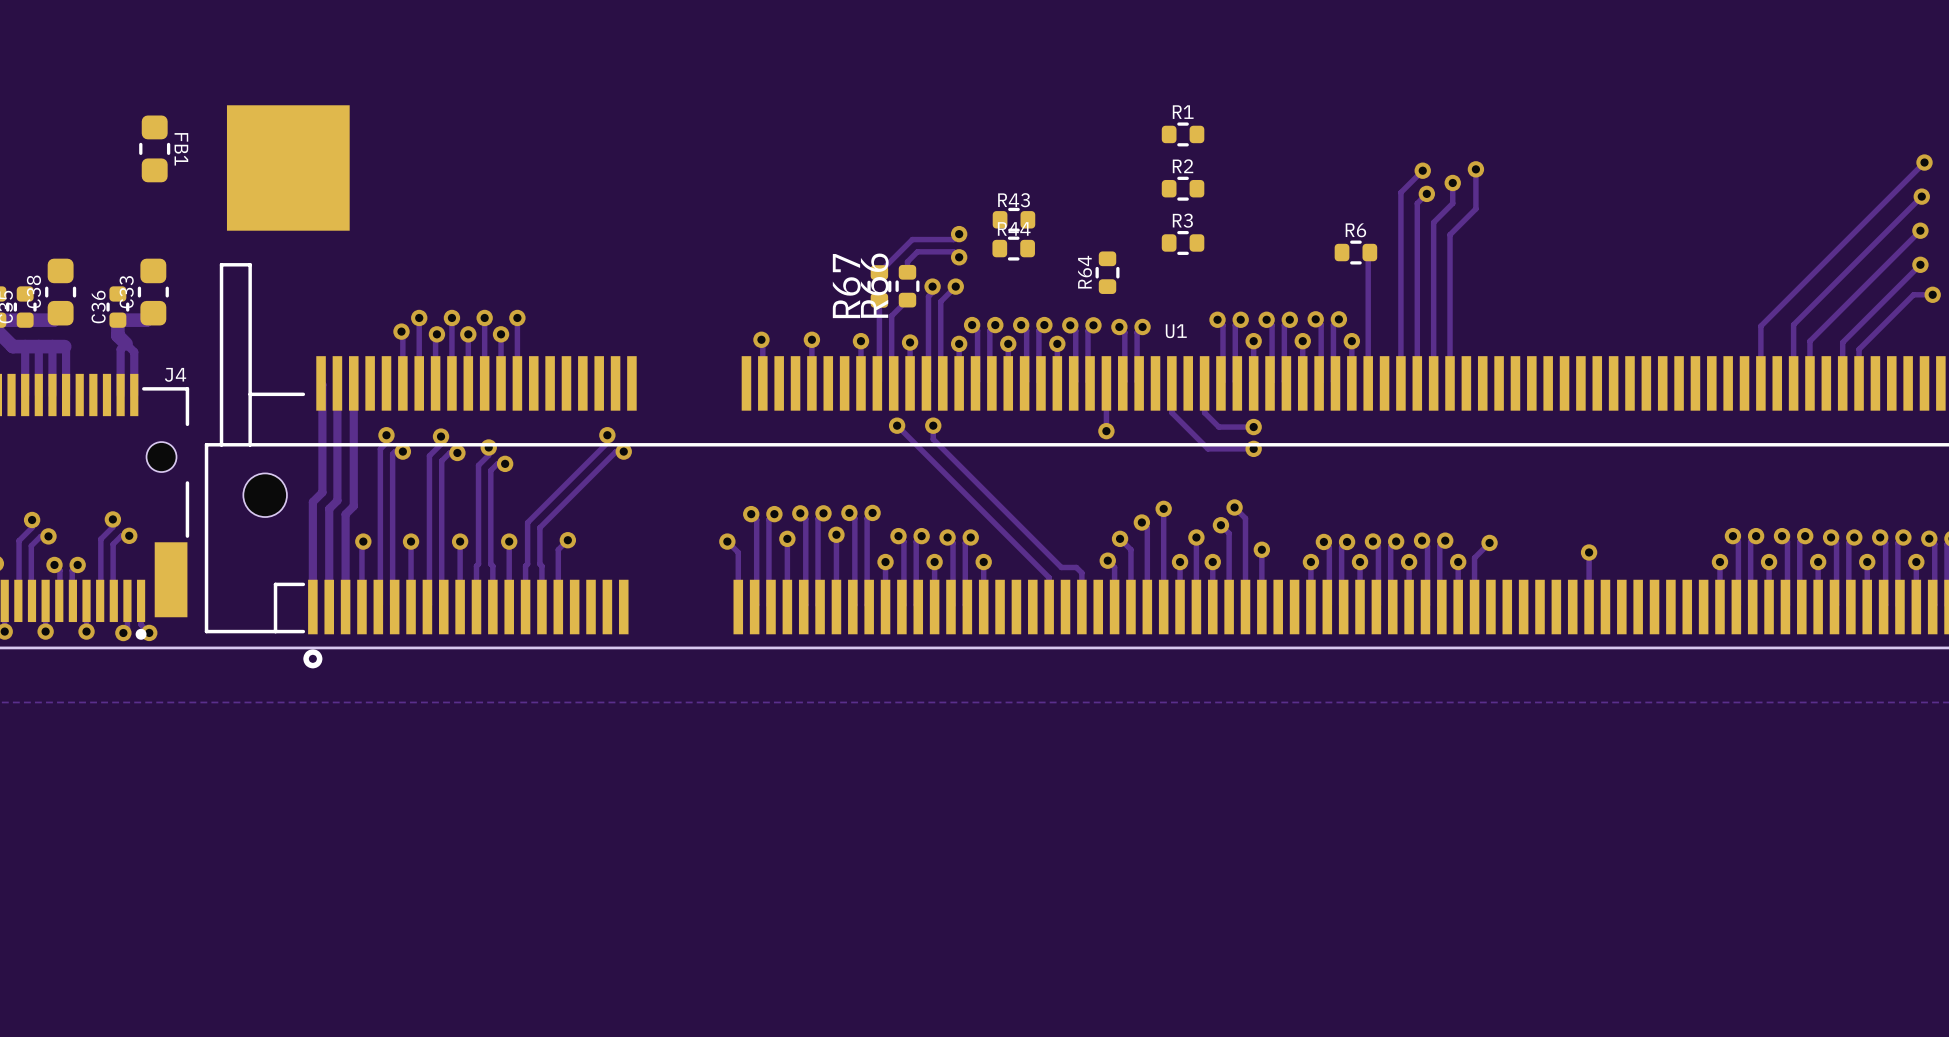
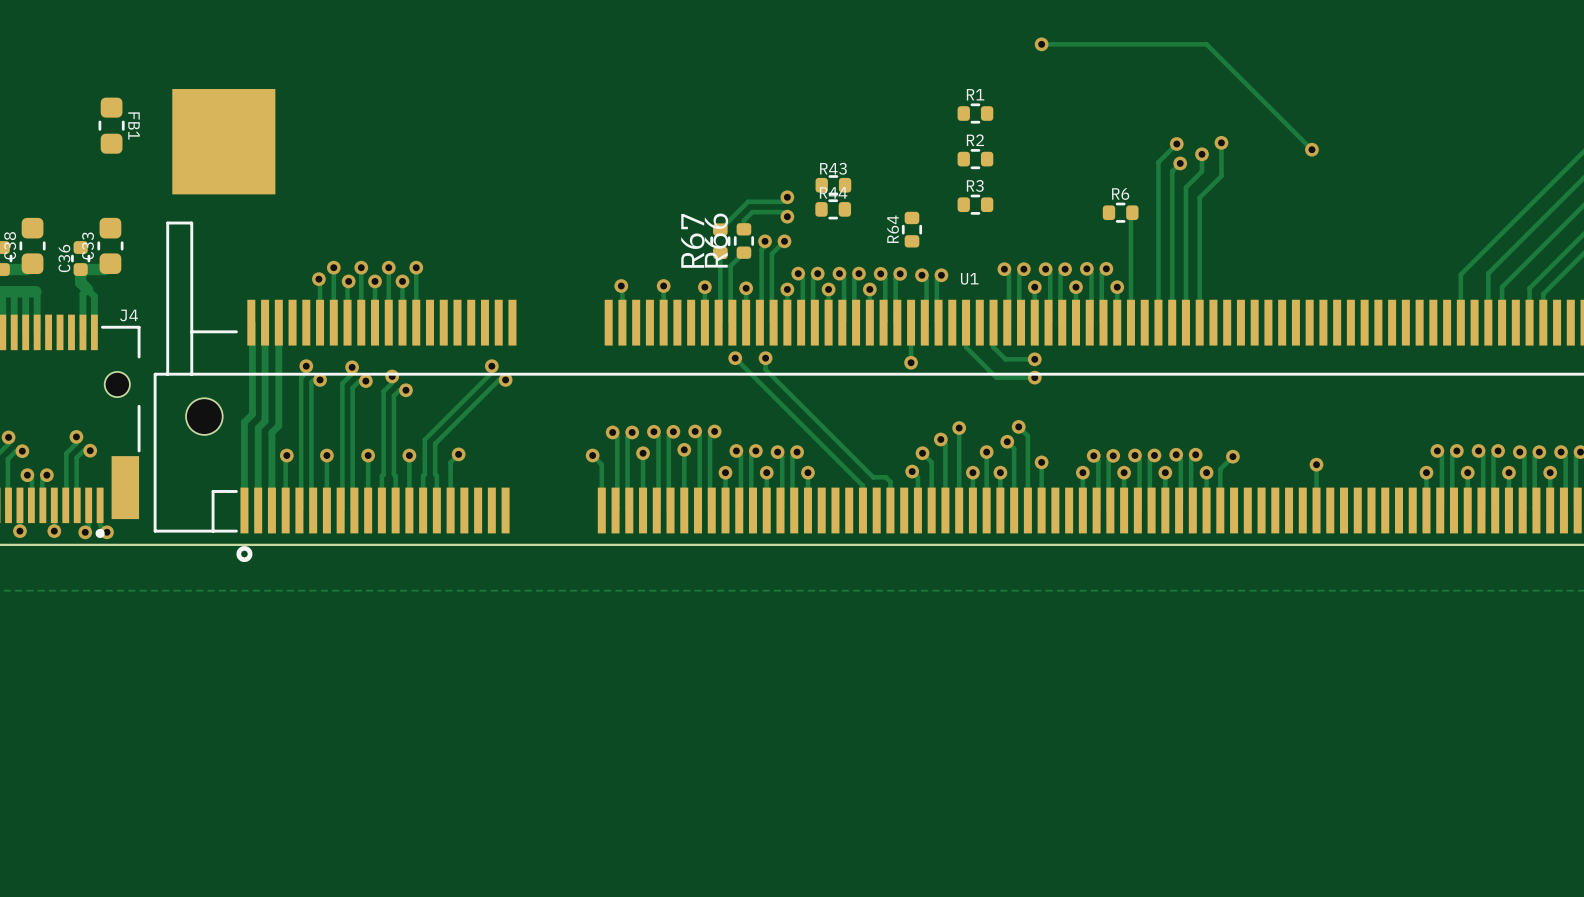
track: none -> (1041, 44) (1206, 44) (1311, 149)
via: none -> (1041, 44)
via: none -> (1311, 149)

